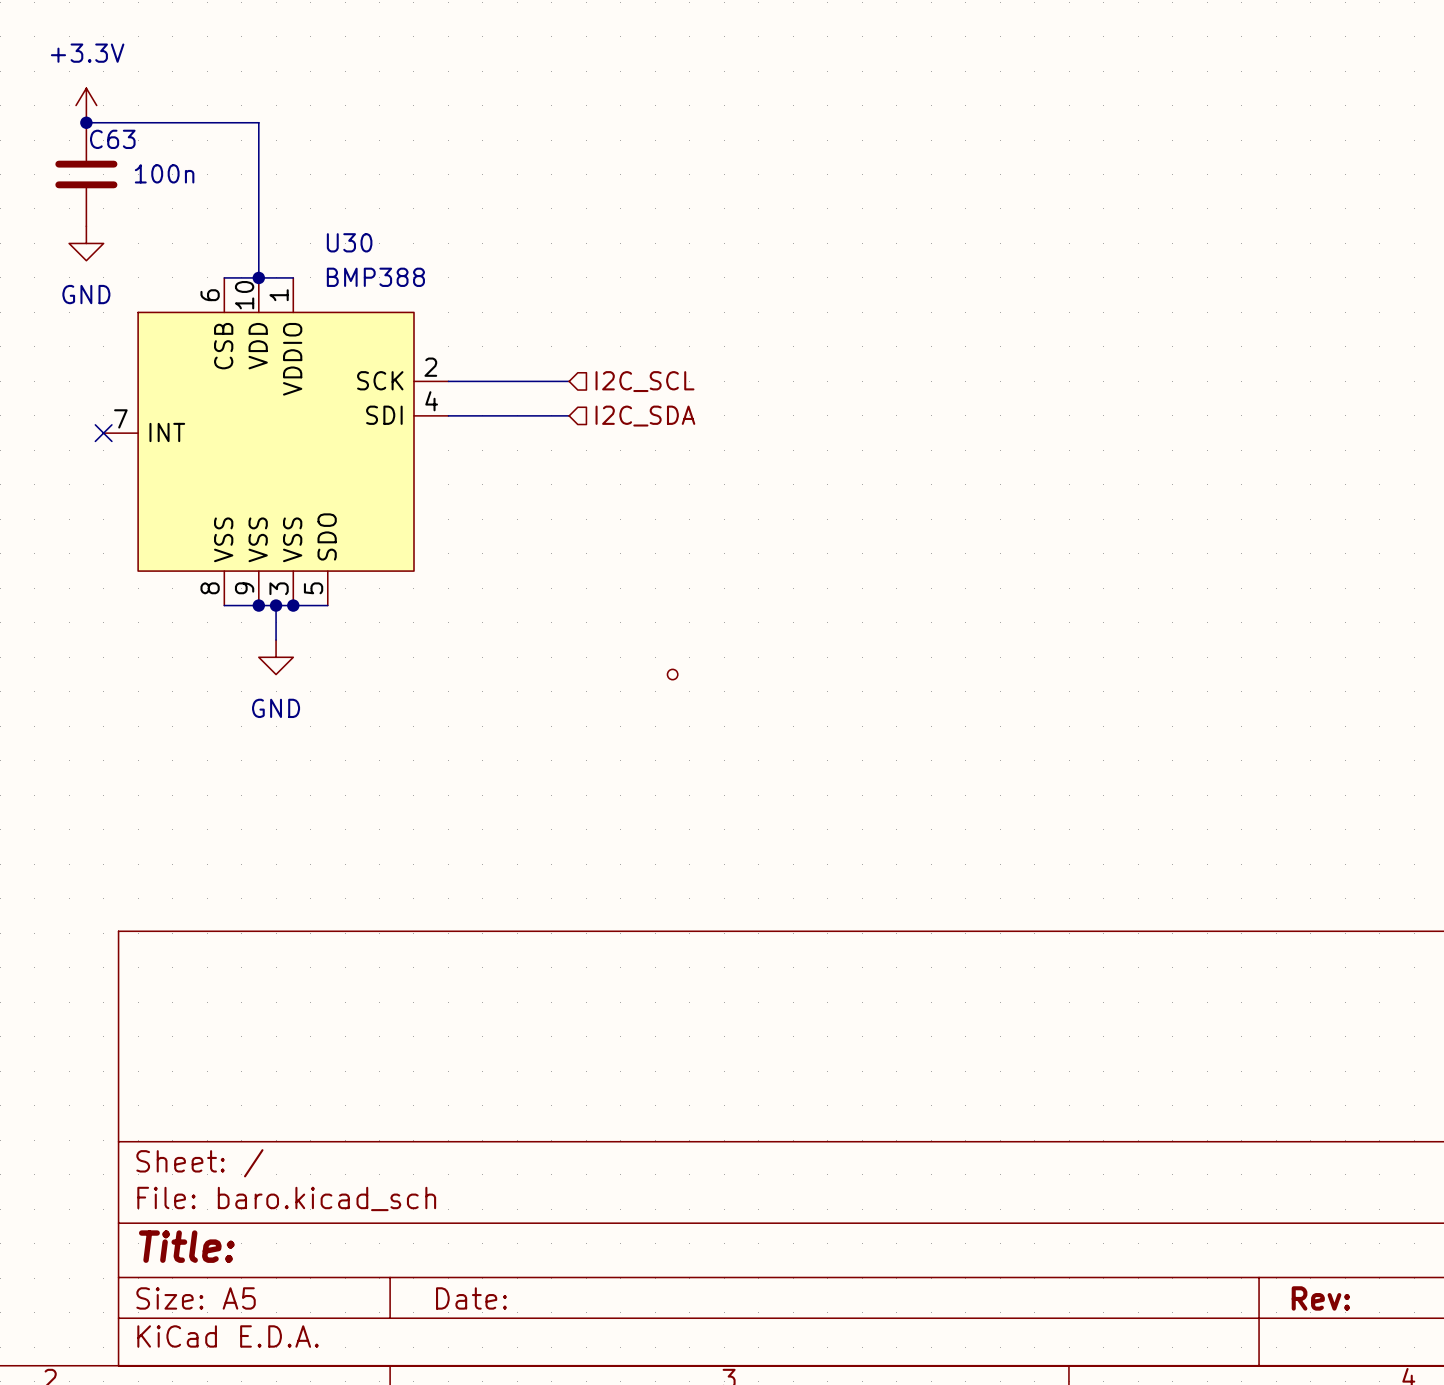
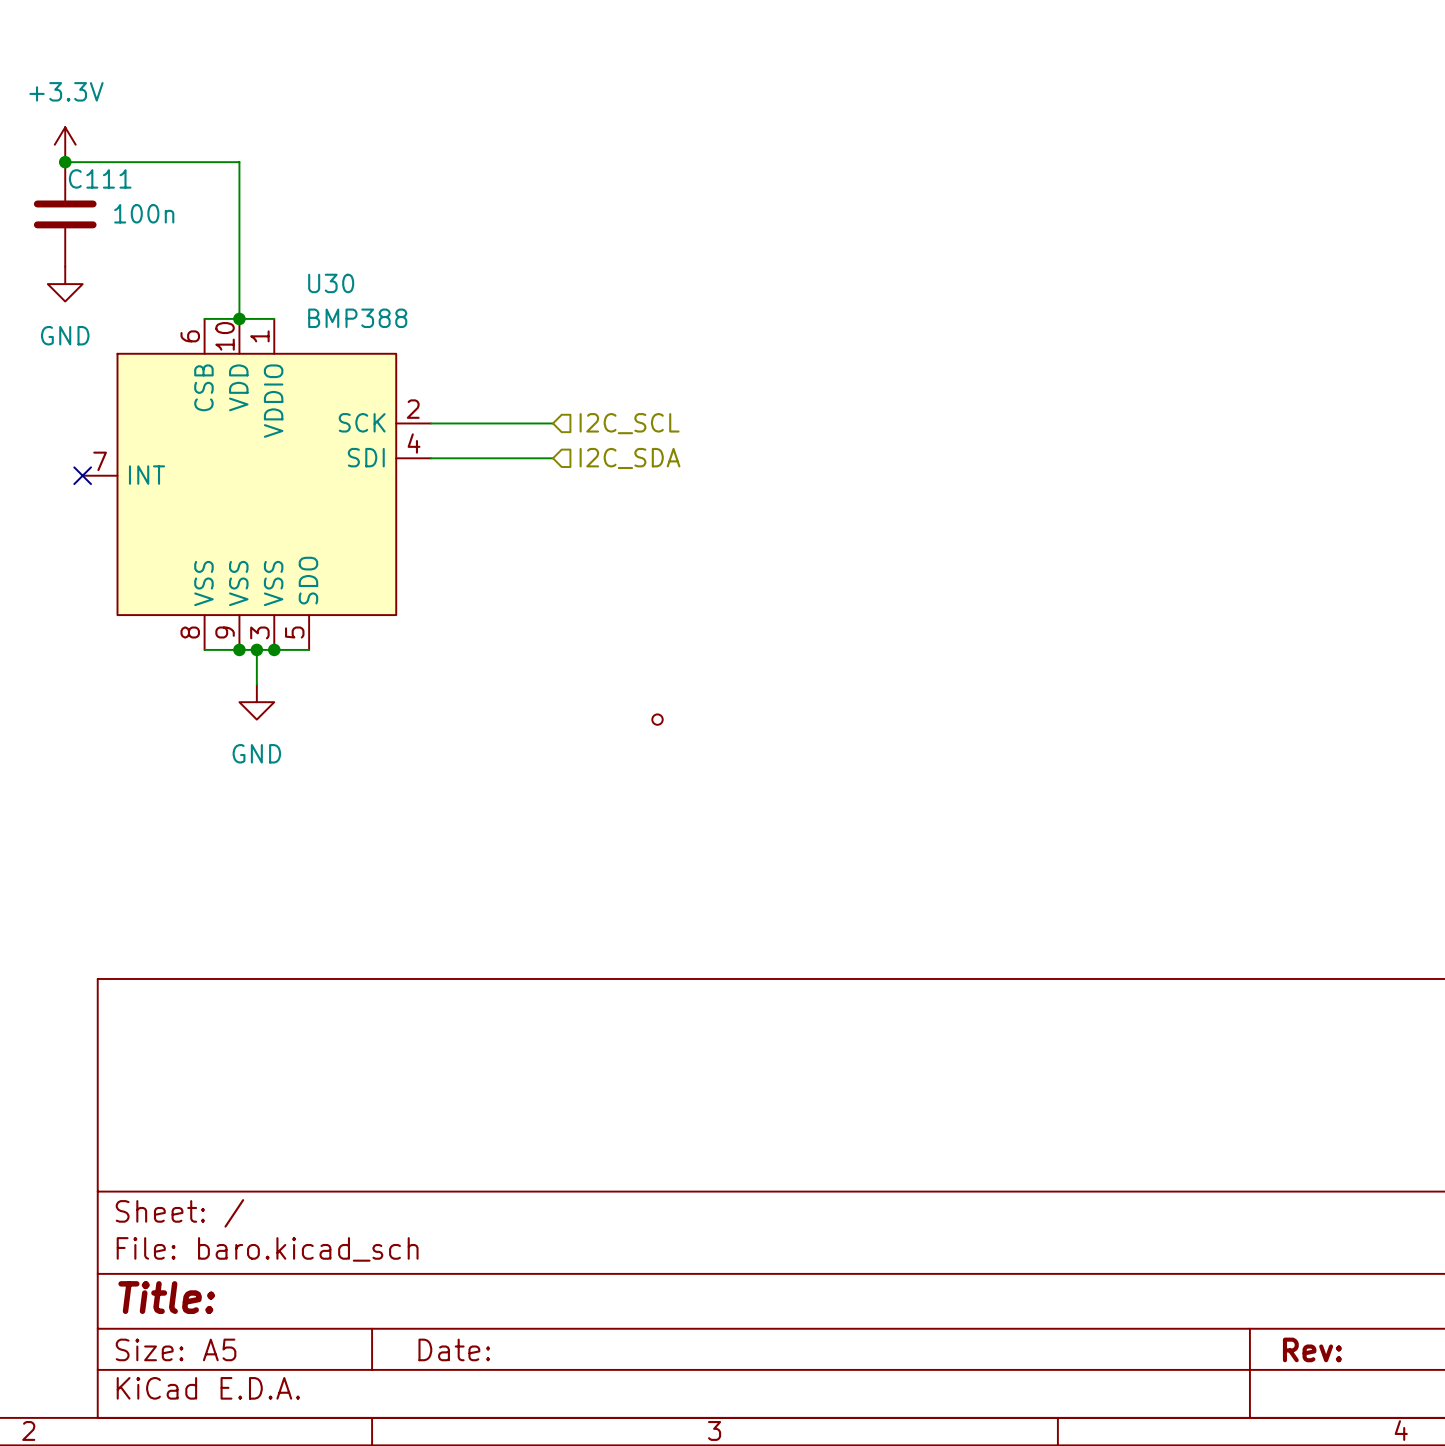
C63 name: C63 (112, 139) -> C111 (100, 178)

